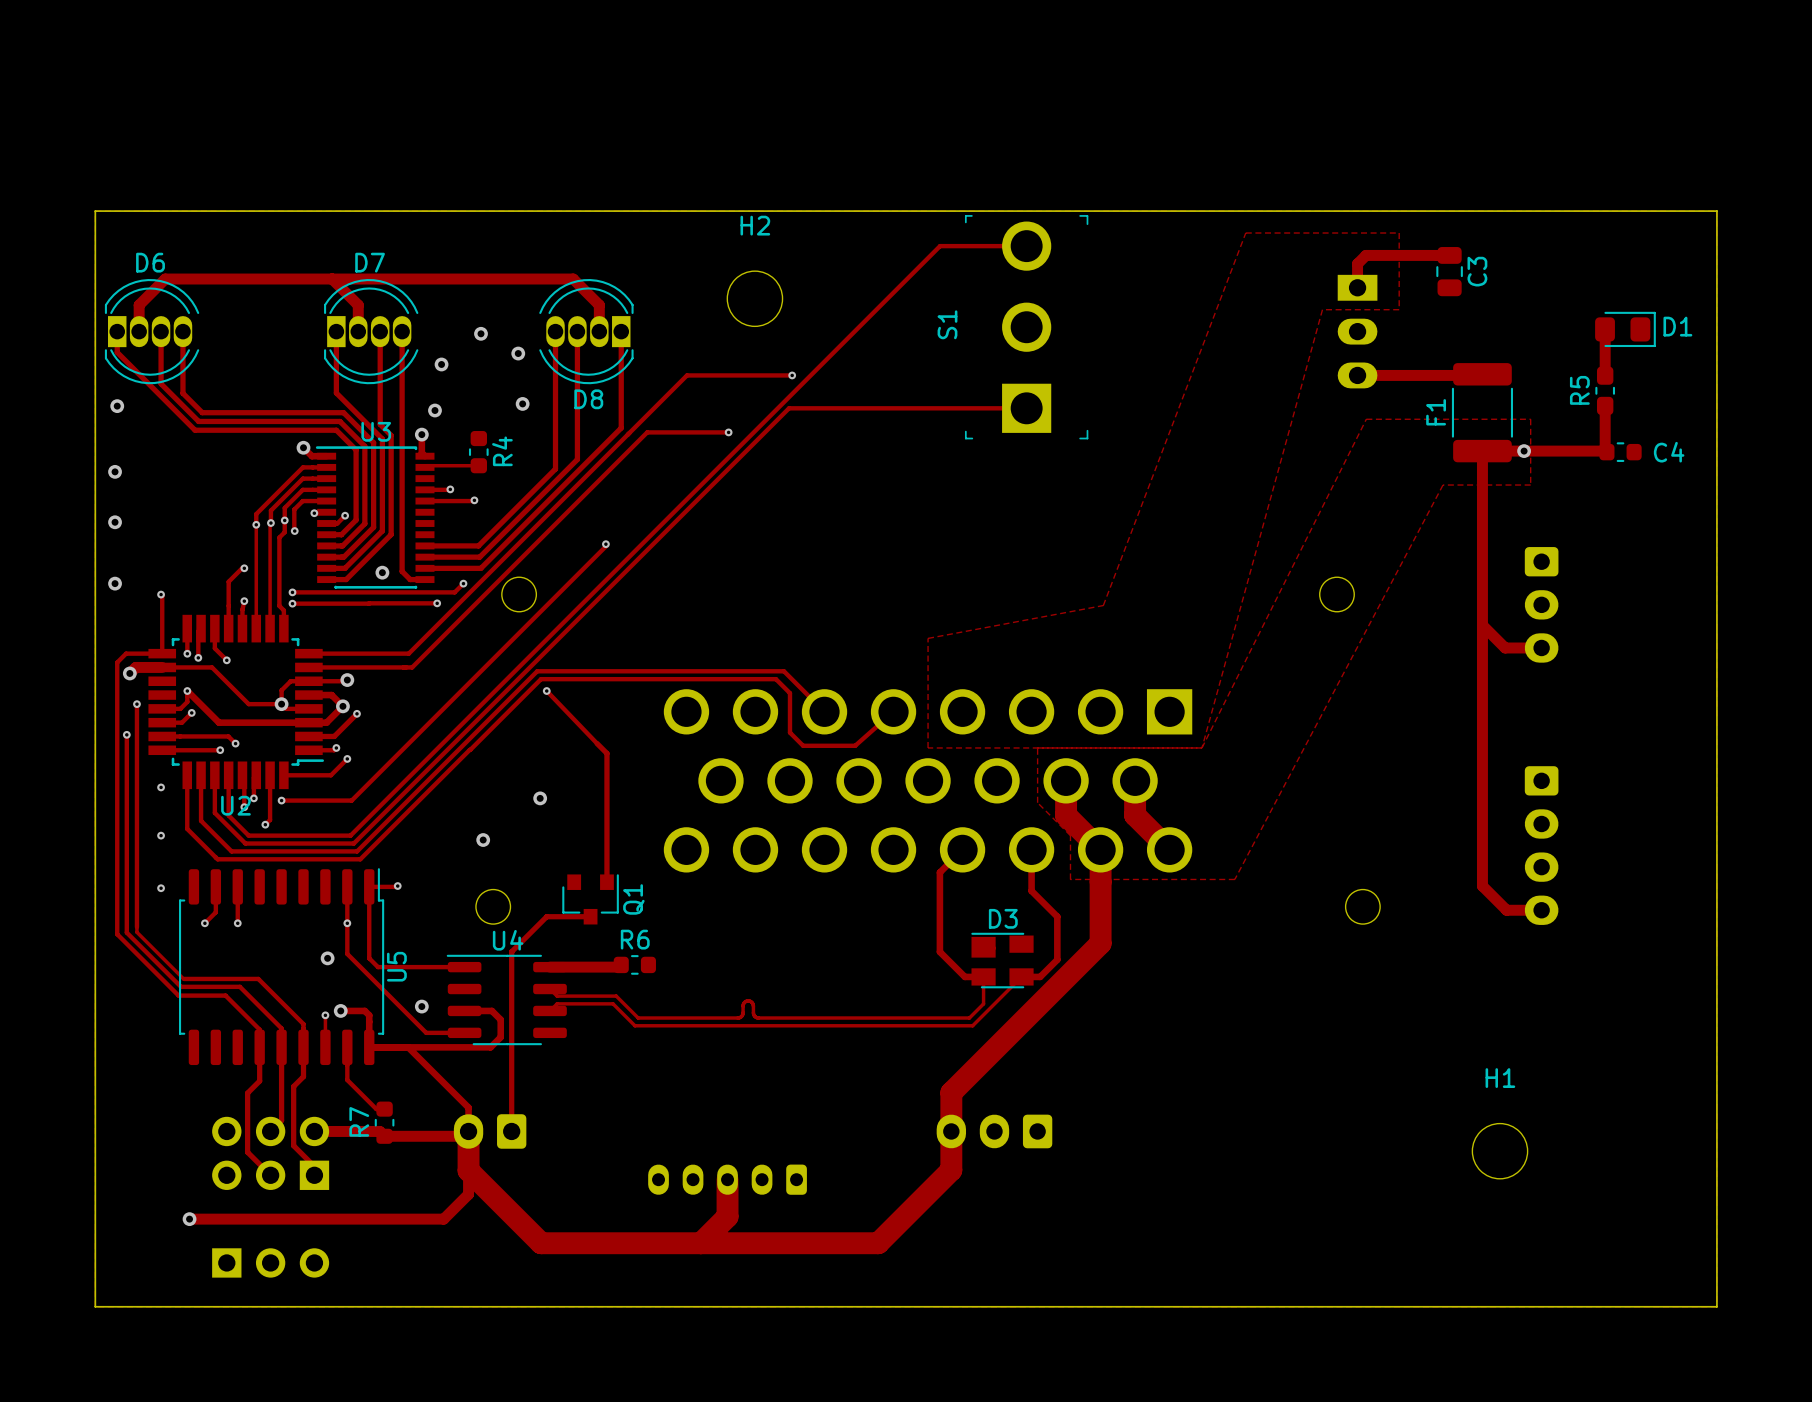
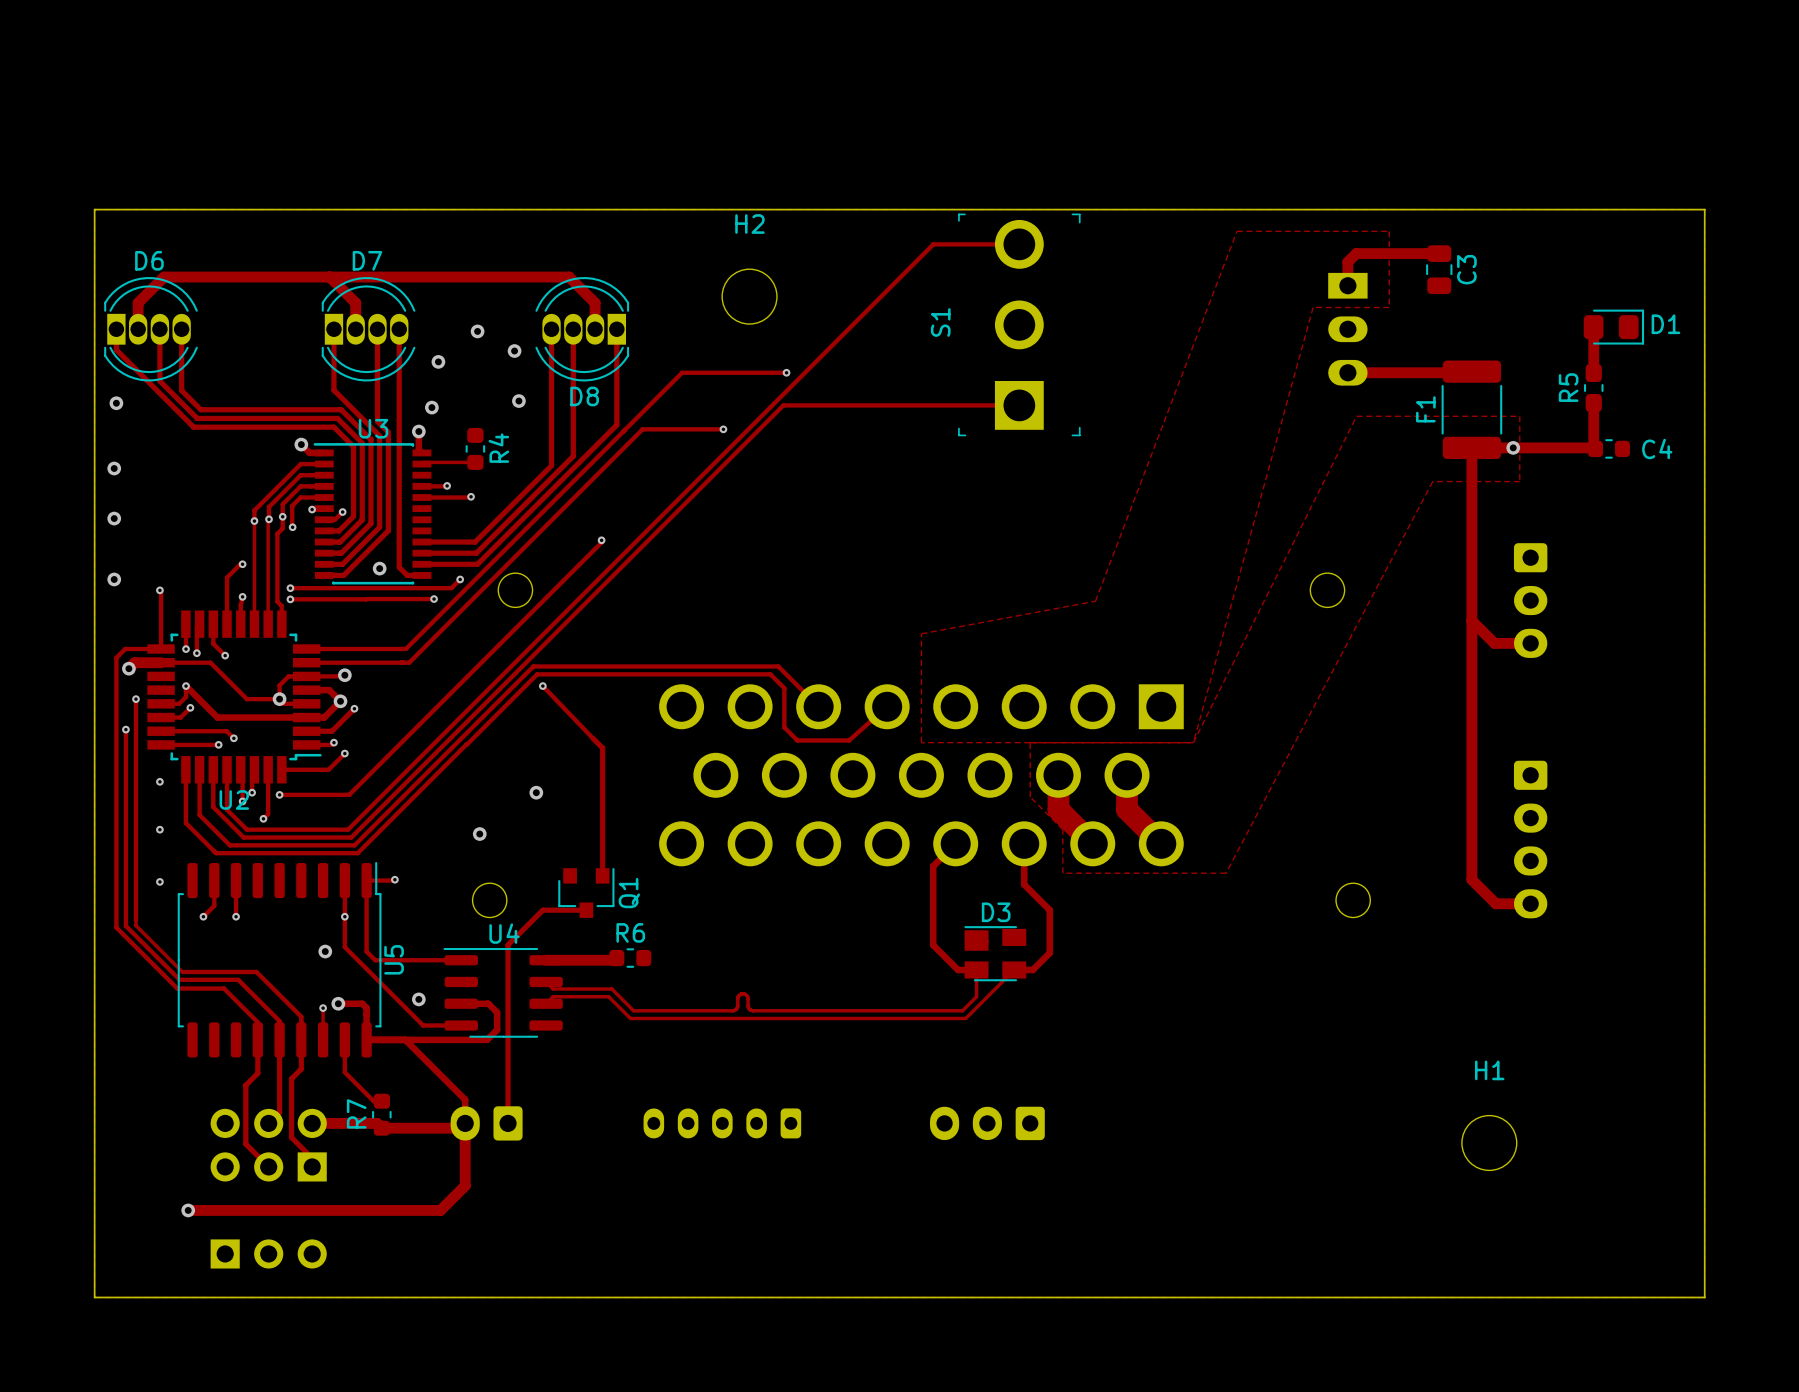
track: (1100, 849) (1100, 943) (951, 1092) (951, 1170) (878, 1243) (541, 1243) (468, 1170) (468, 1131) -> none
track: (727, 1179) (727, 1216) (701, 1243) -> none
part position: (727, 1179) -> (722, 1123)

